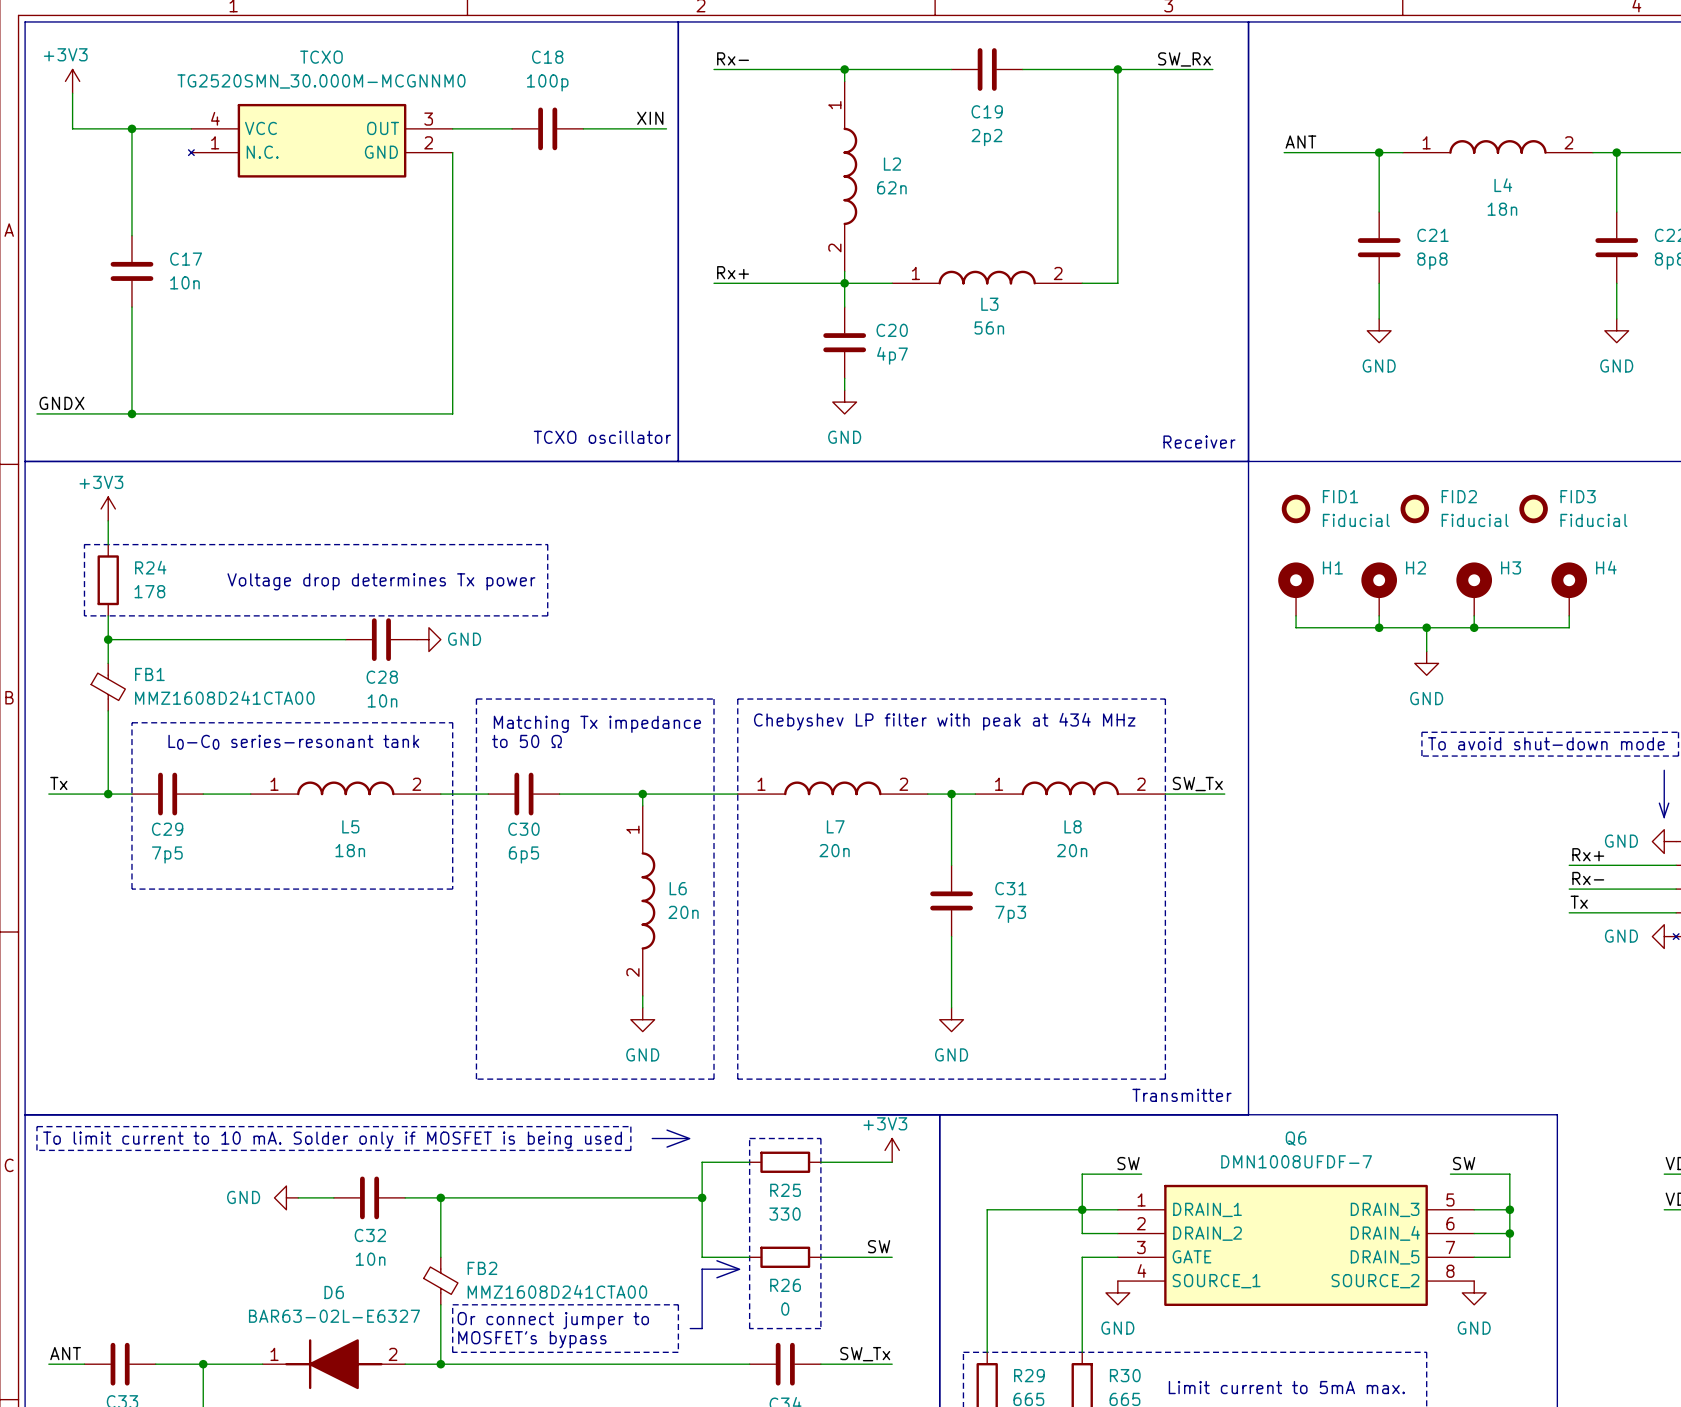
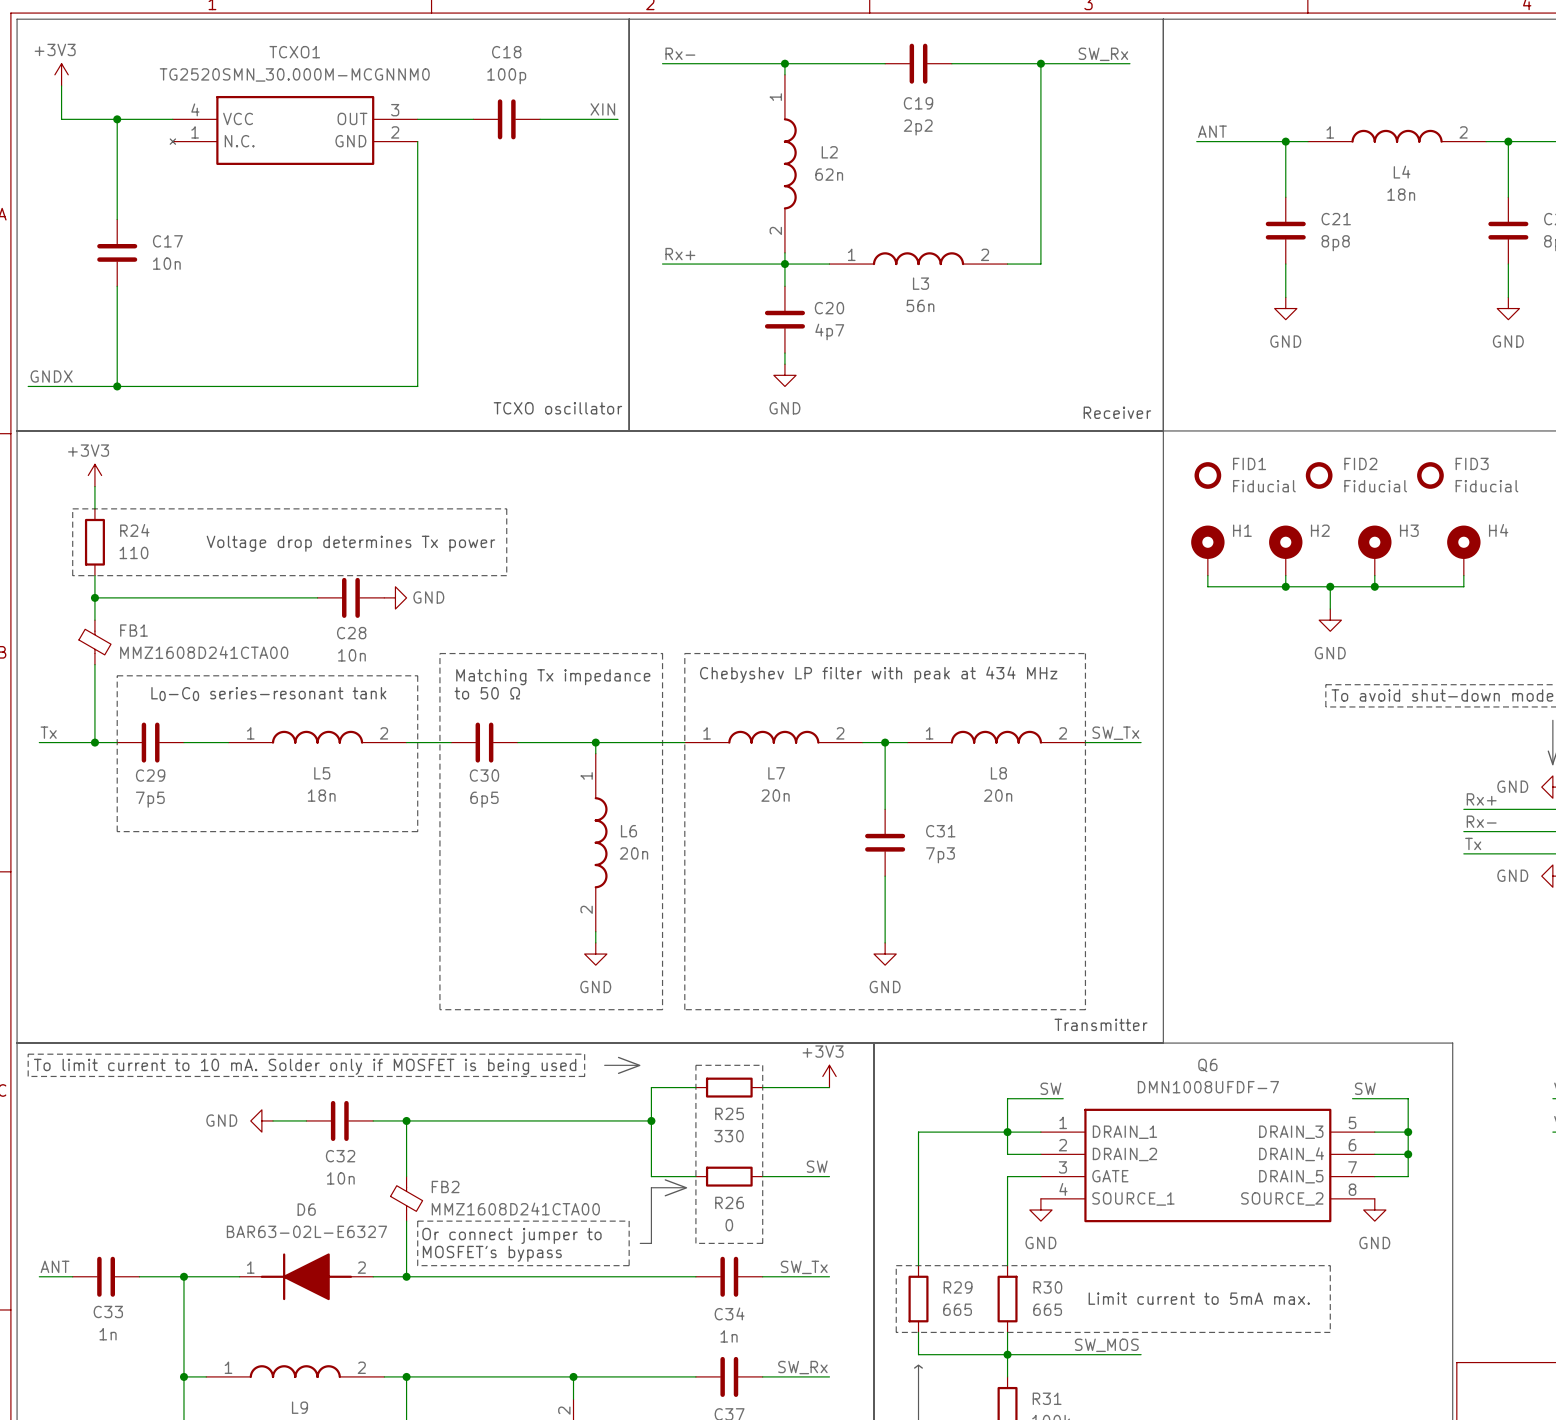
TCXO name: TCXO (321, 57) -> TCXO1 (294, 52)
R24 value: 178 (149, 591) -> 110 (133, 552)

